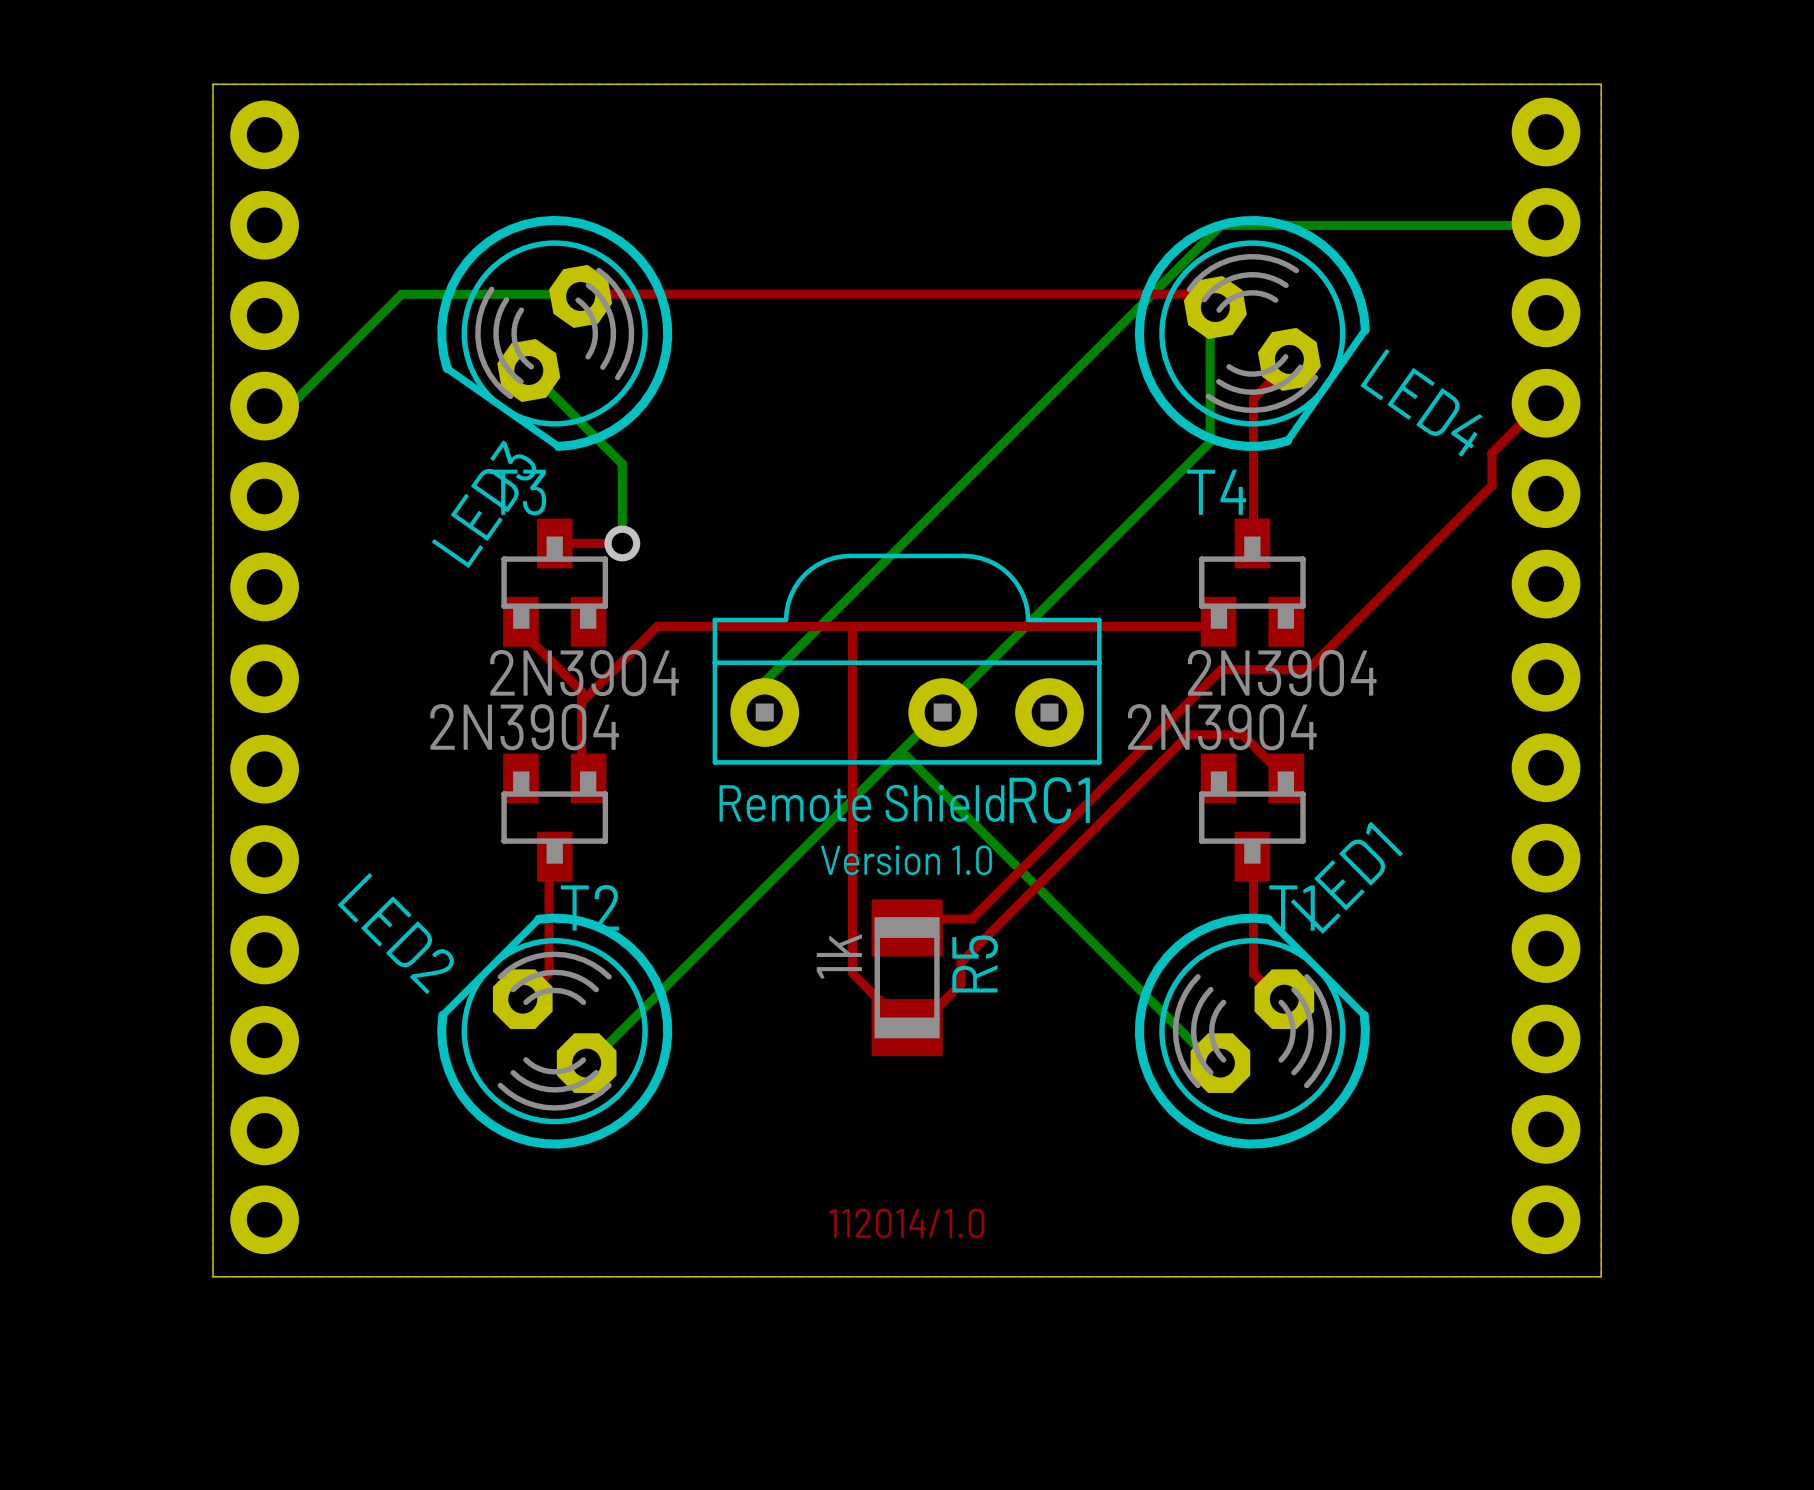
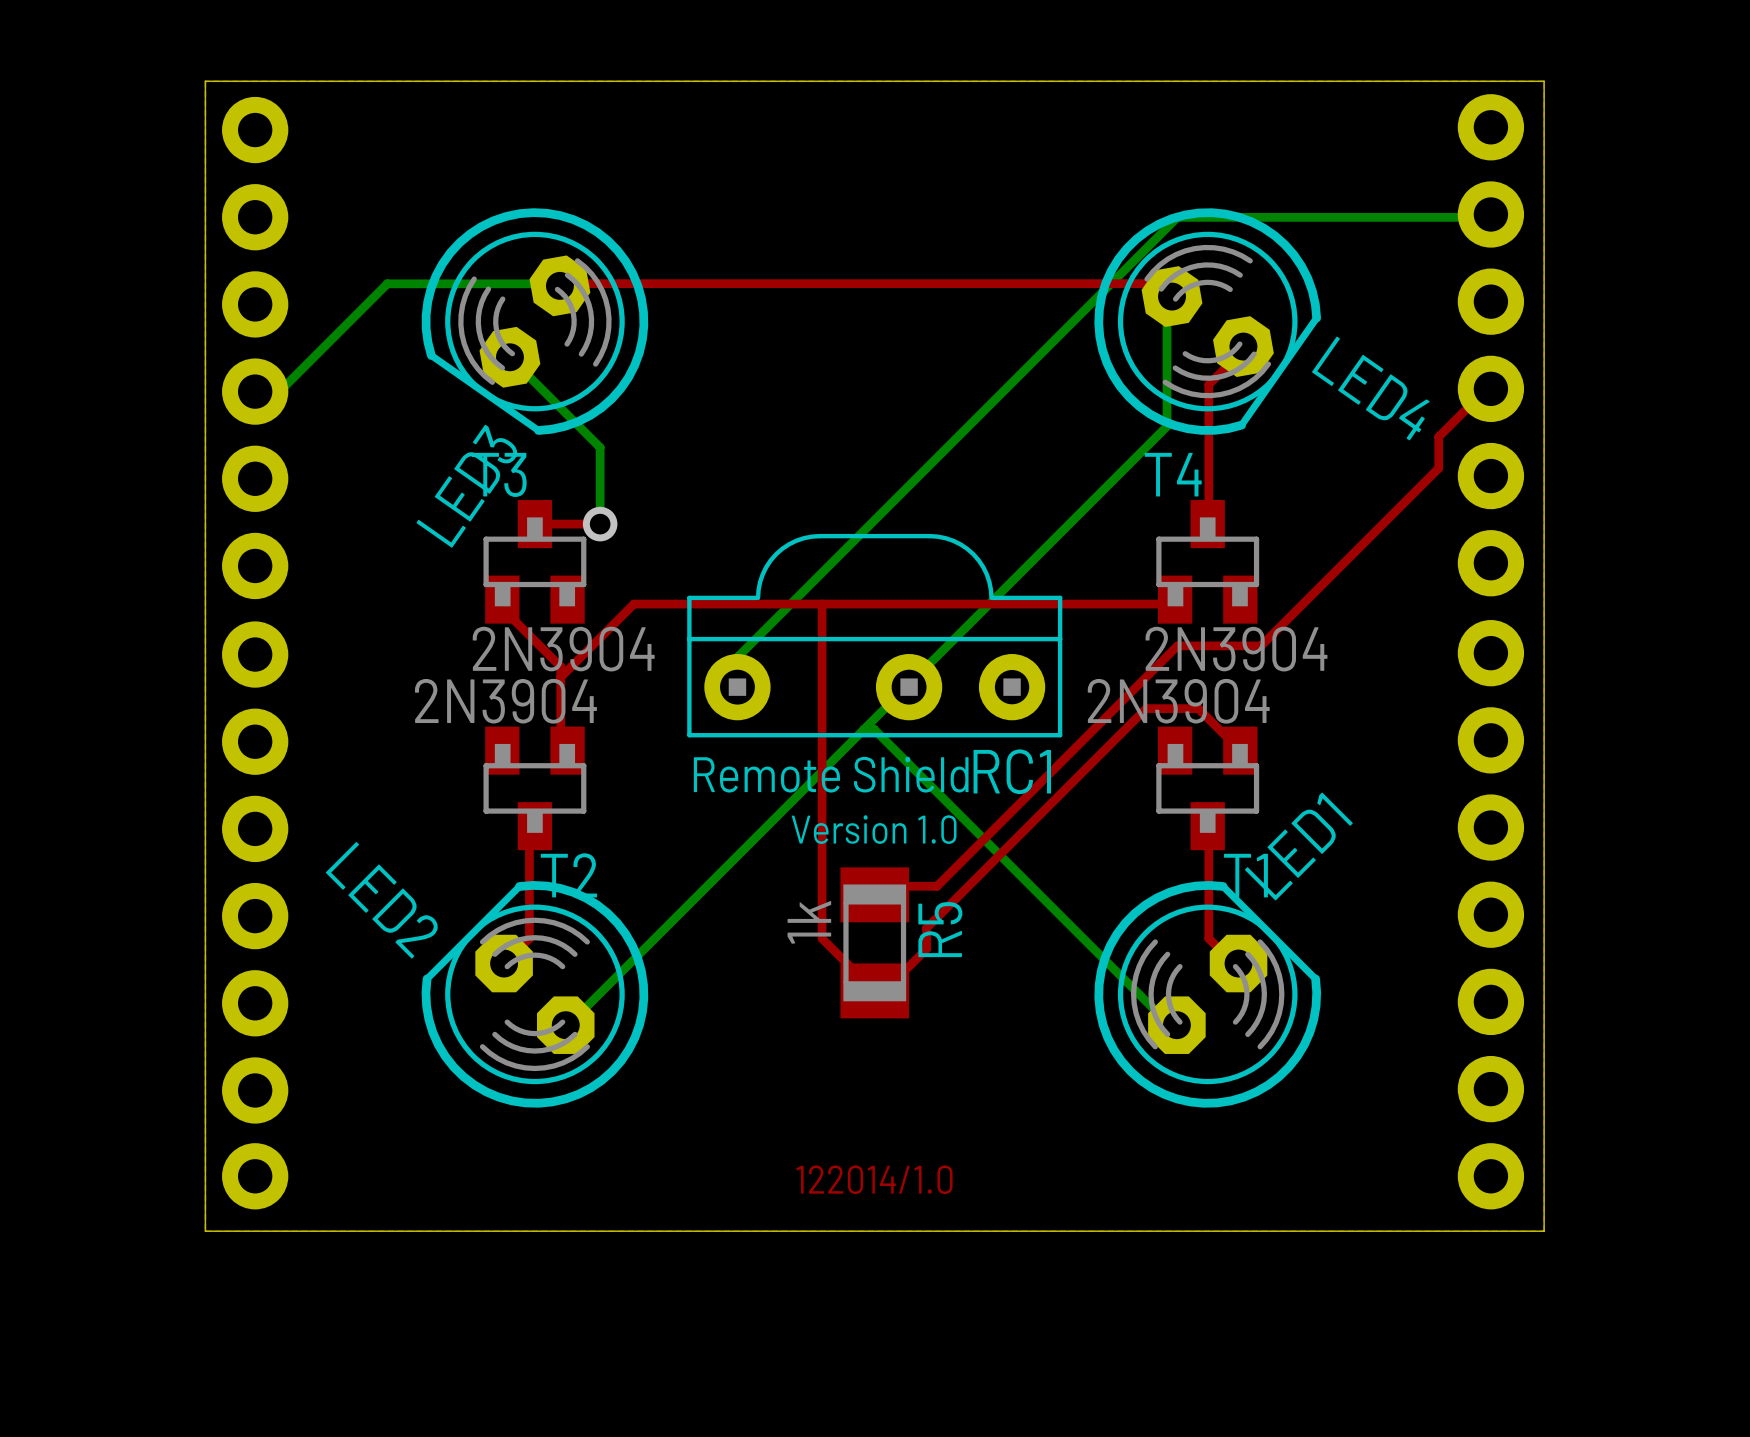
text: 112014/1.0 (906, 1223) -> 122014/1.0 (874, 1179)

